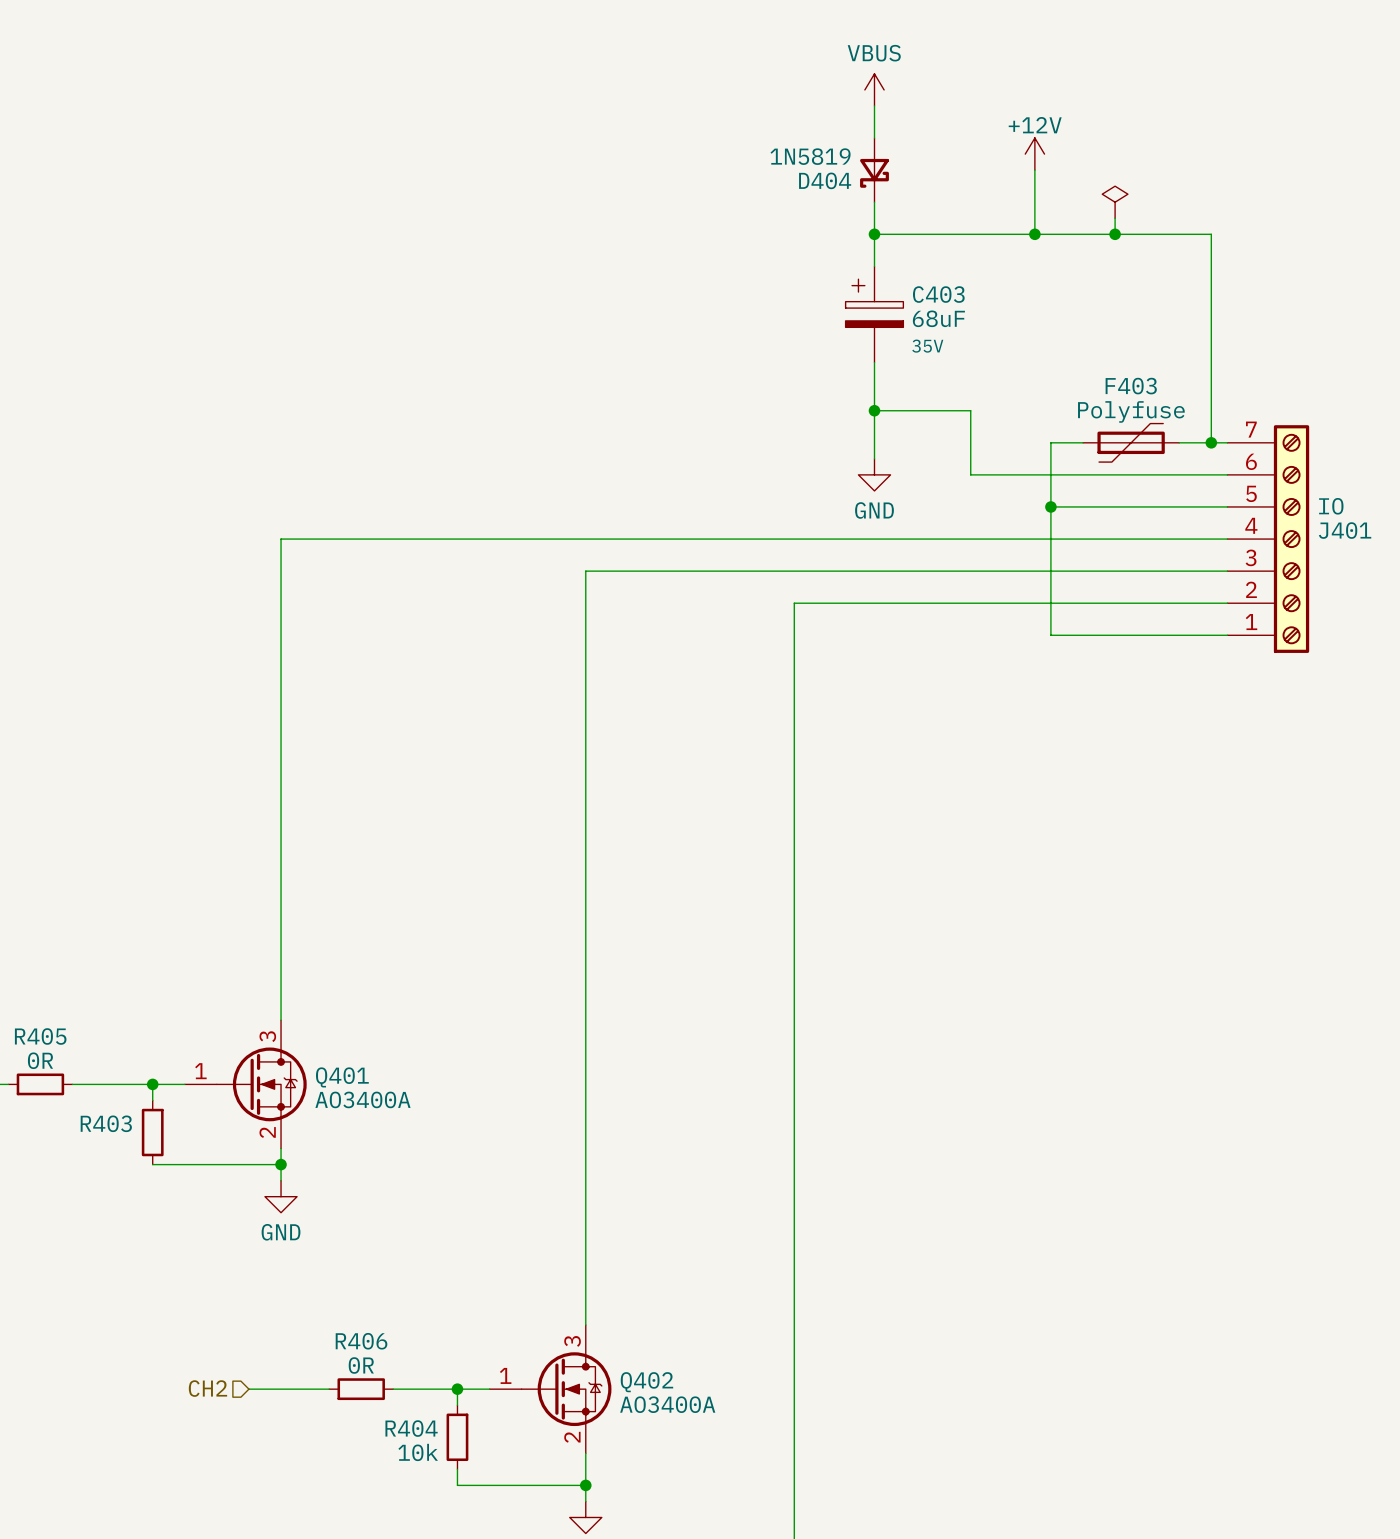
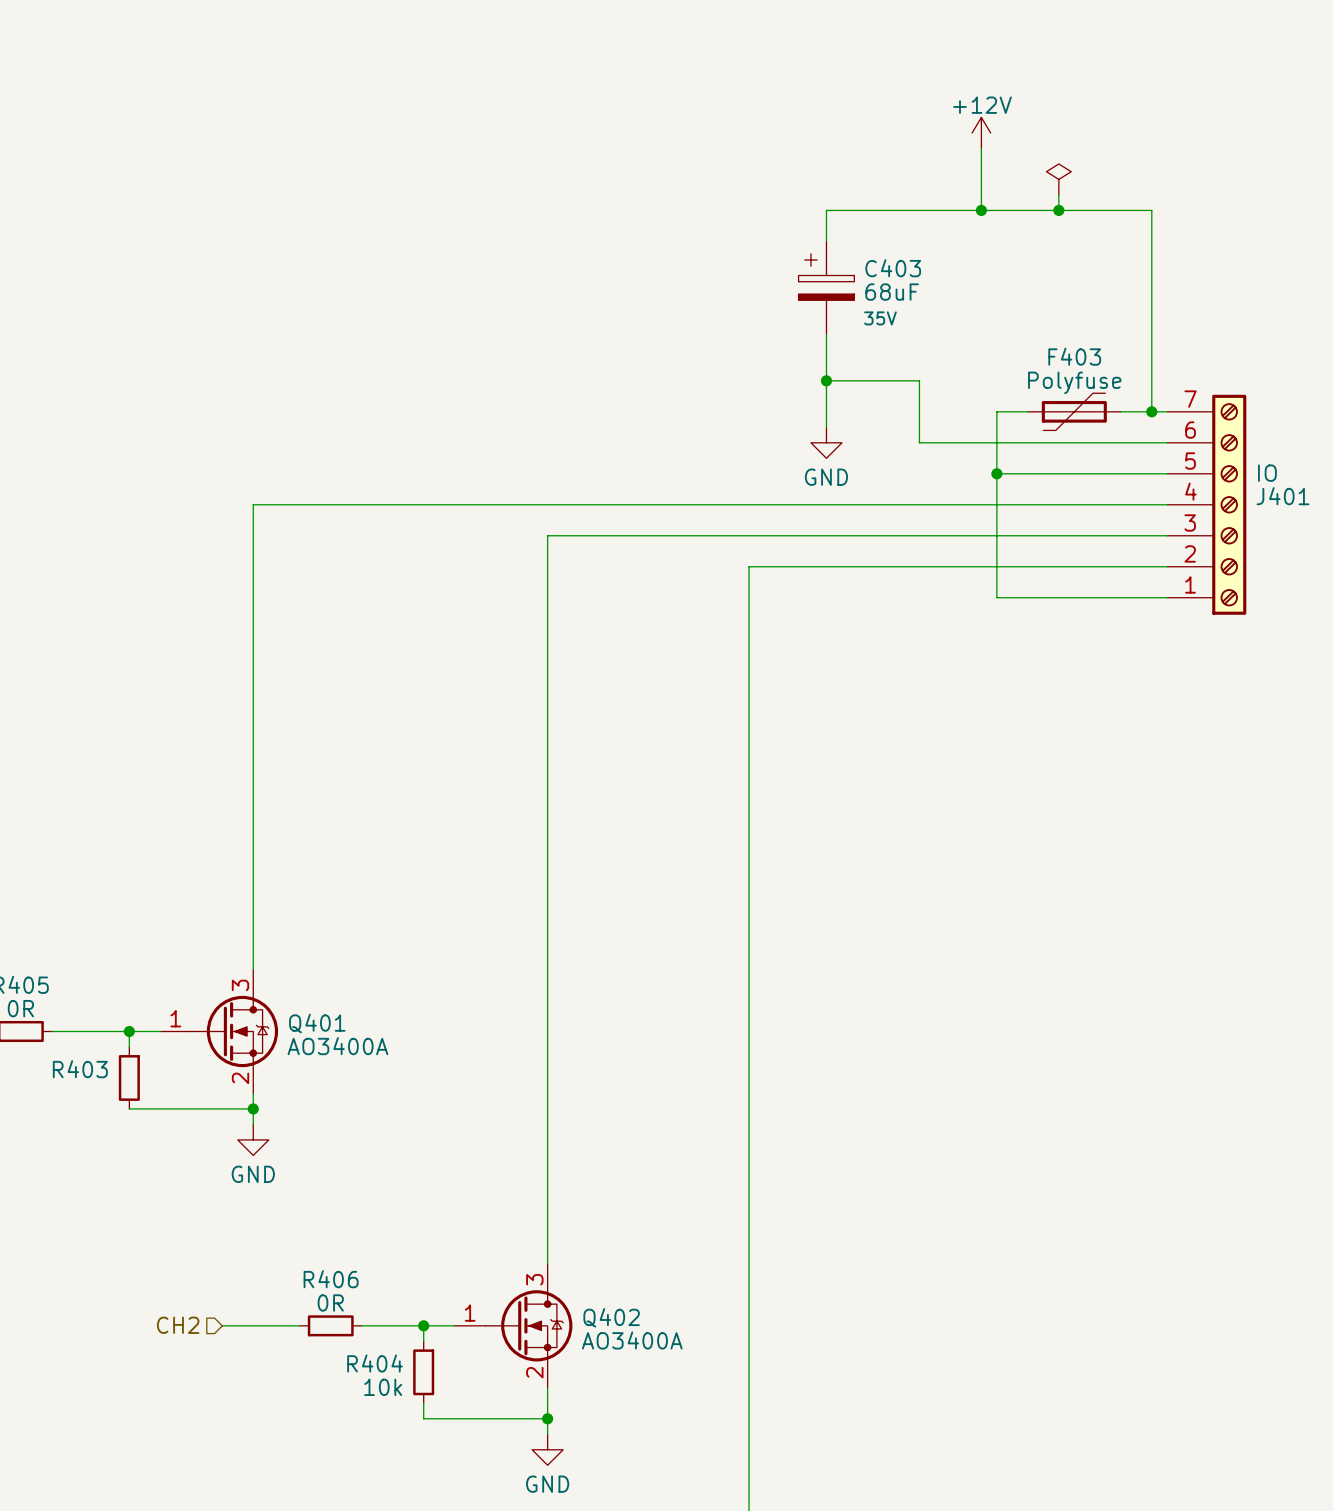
power symbol: VBUS (874, 89) -> none
wire: (874, 105) (874, 138) -> none
D404: 1N5819 (874, 170) -> none
wire: (874, 202) (874, 234) -> none
junction: (874, 234) -> none

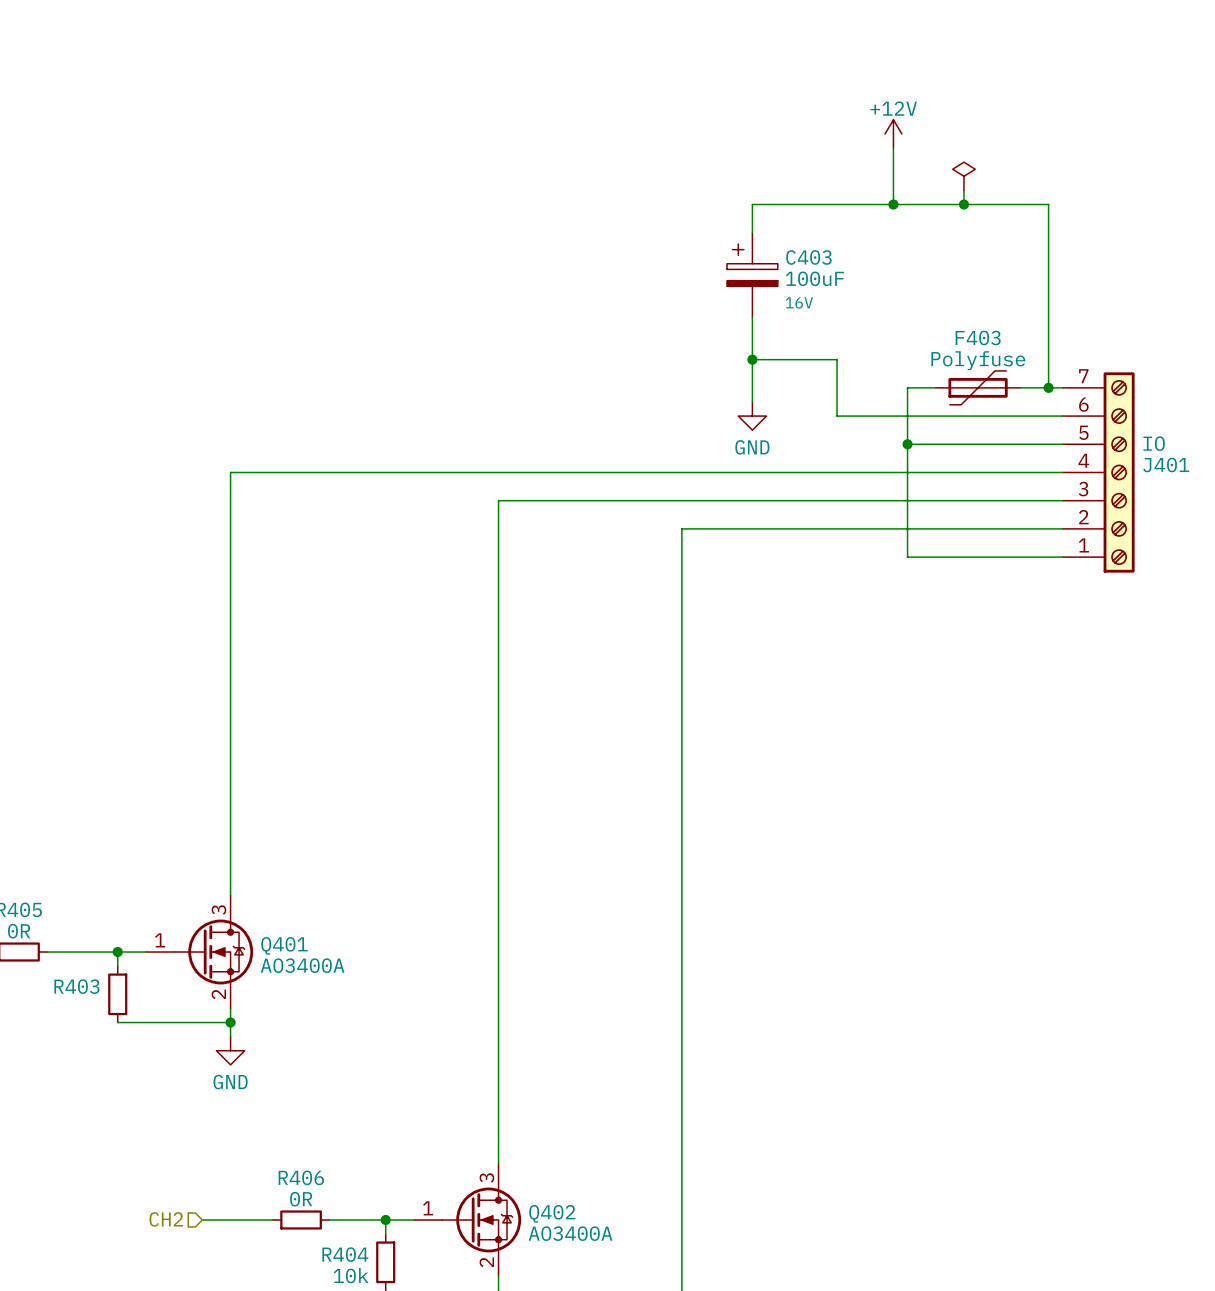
C403 value: 68uF (892, 292) -> 100uF (814, 278)
C403 text: 35V (880, 318) -> 16V (799, 302)

